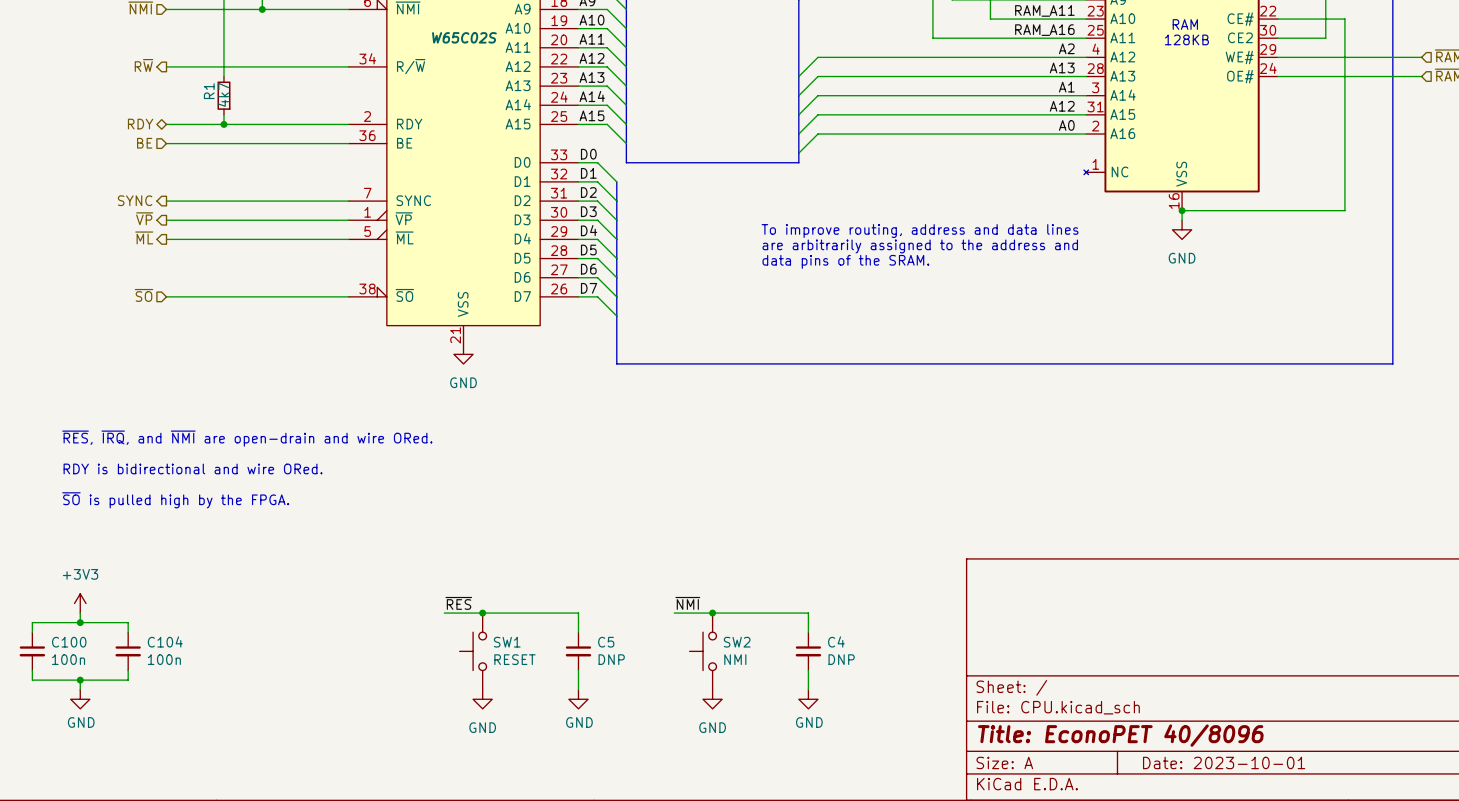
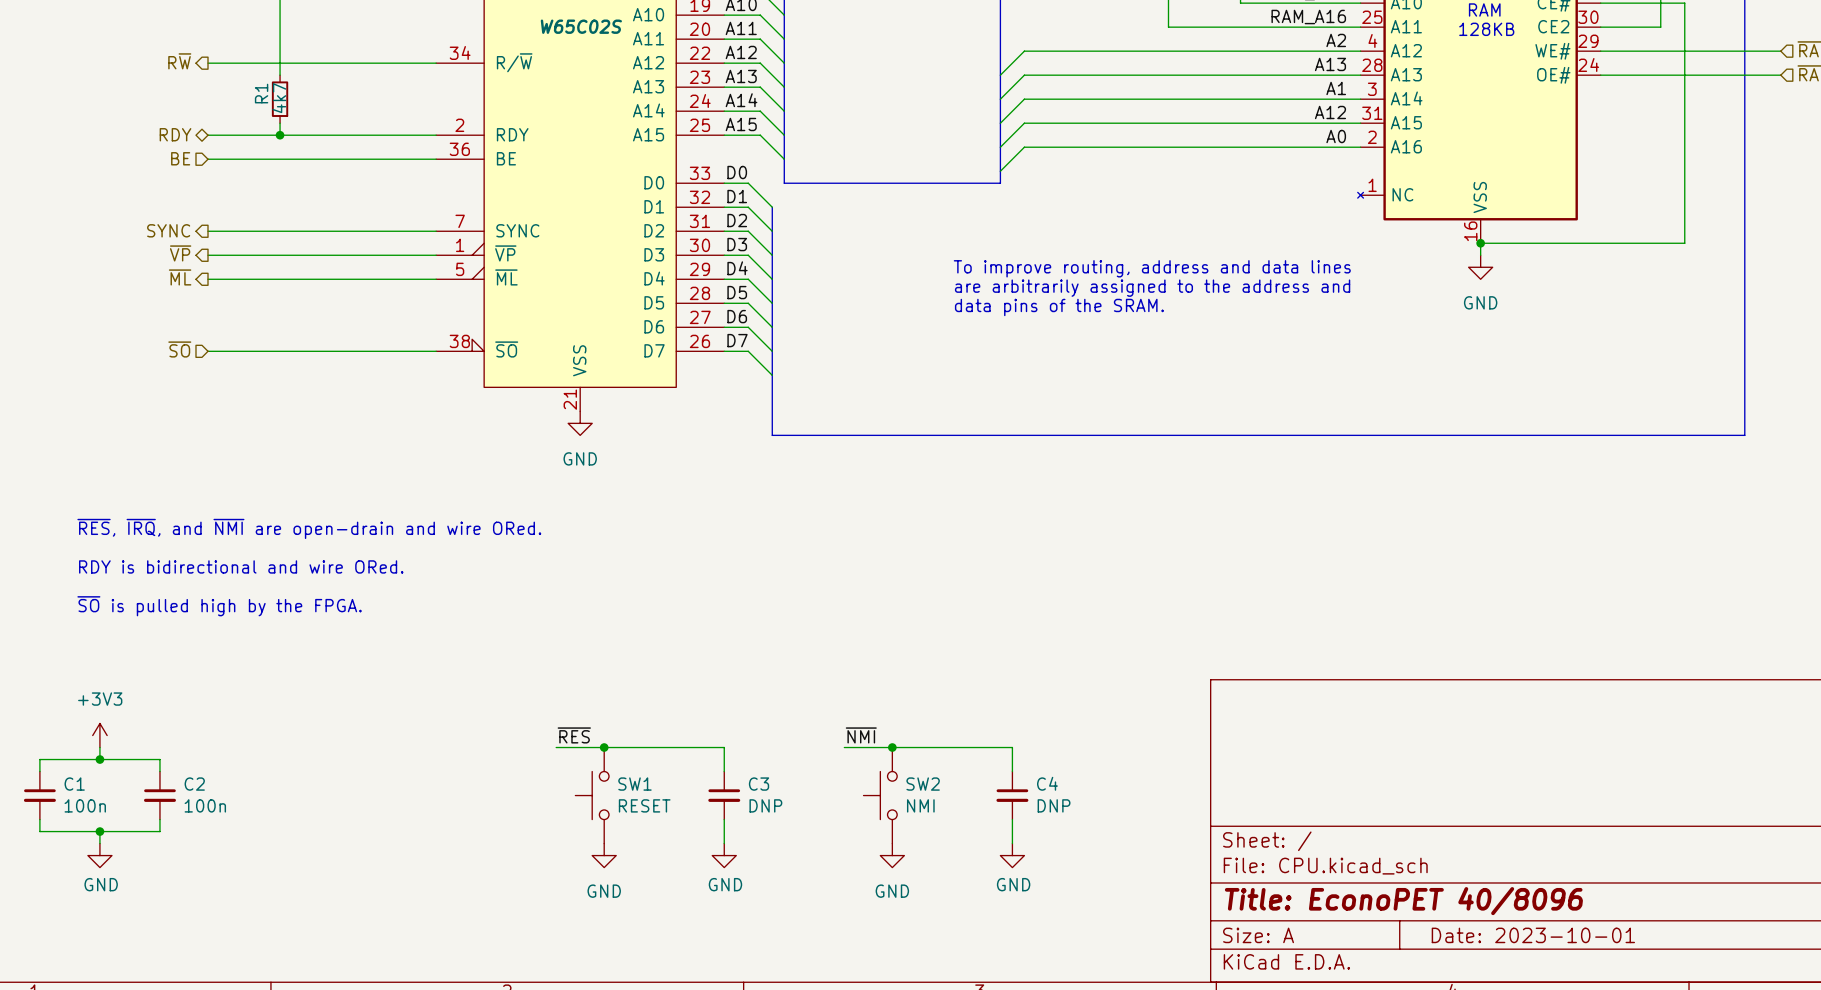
C104 name: C104 (165, 641) -> C2 (194, 784)
C100 name: C100 (69, 642) -> C1 (74, 784)
C5 name: C5 (606, 642) -> C3 (759, 784)

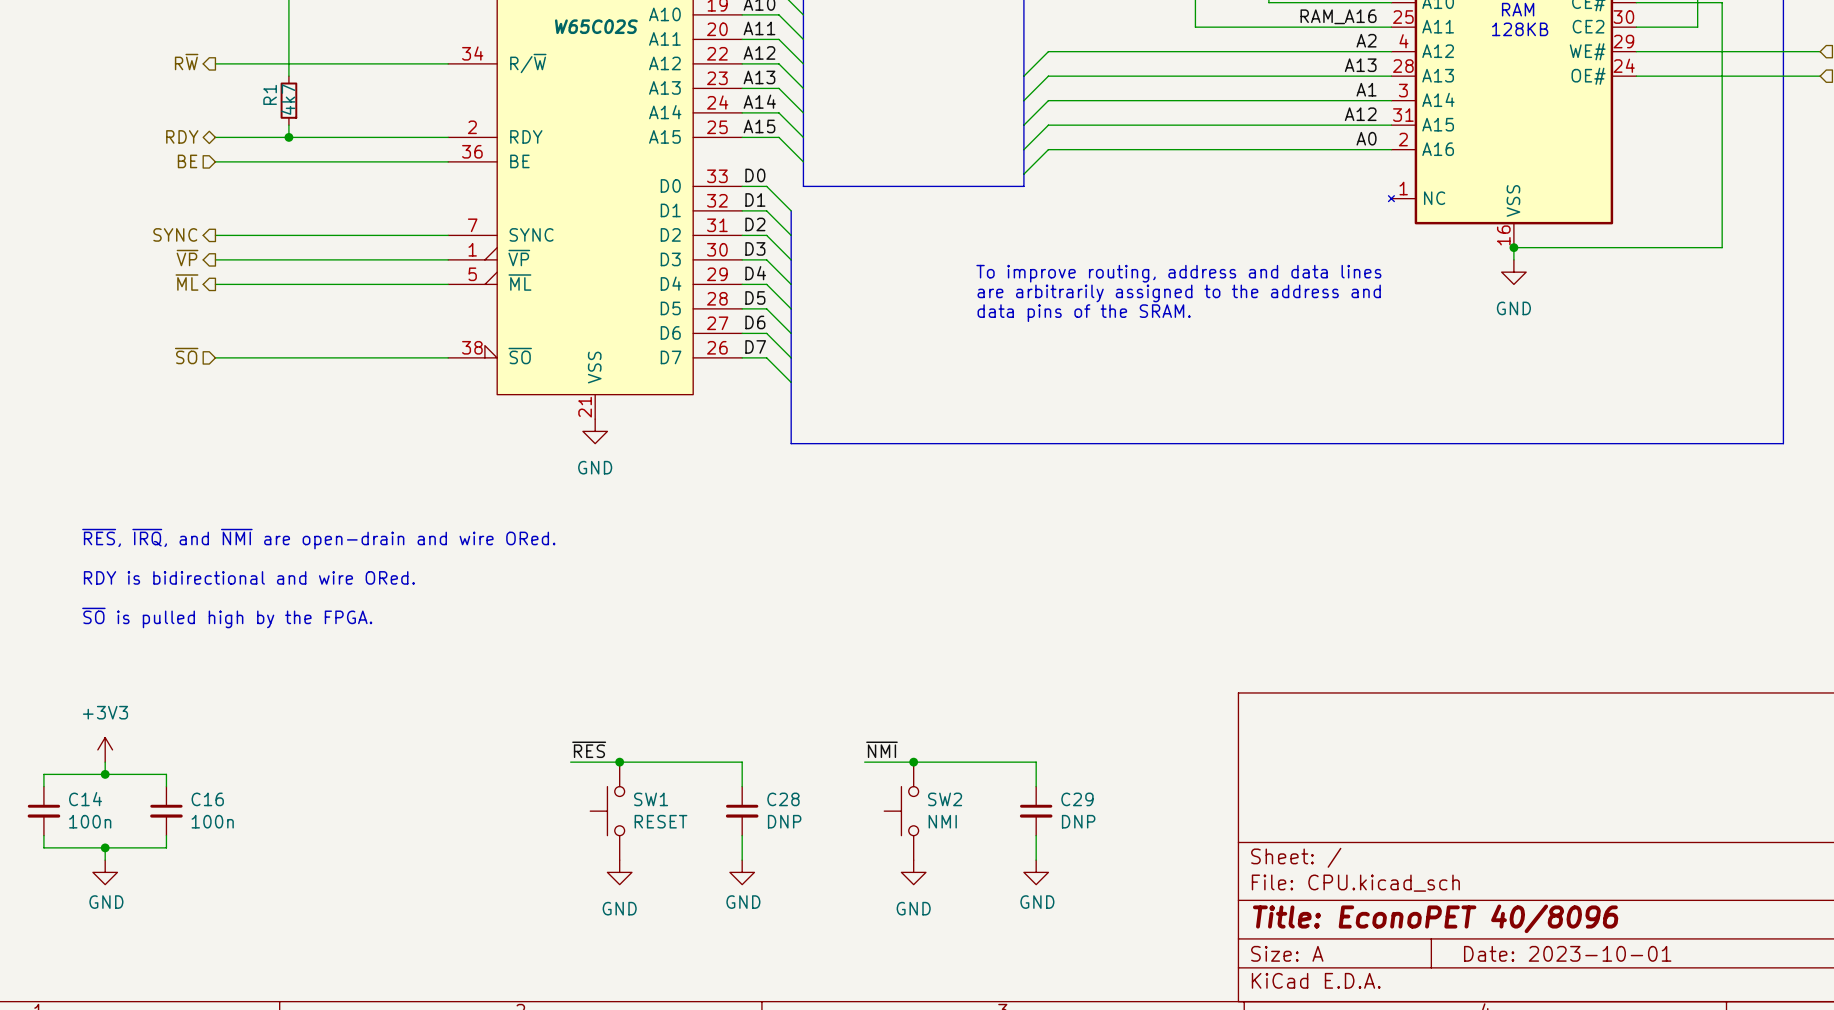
C4 name: C4 (1047, 783) -> C29 (1077, 799)
C1 name: C1 (74, 784) -> C14 (85, 799)
C2 name: C2 (194, 784) -> C16 (207, 799)
C3 name: C3 (759, 784) -> C28 (783, 799)

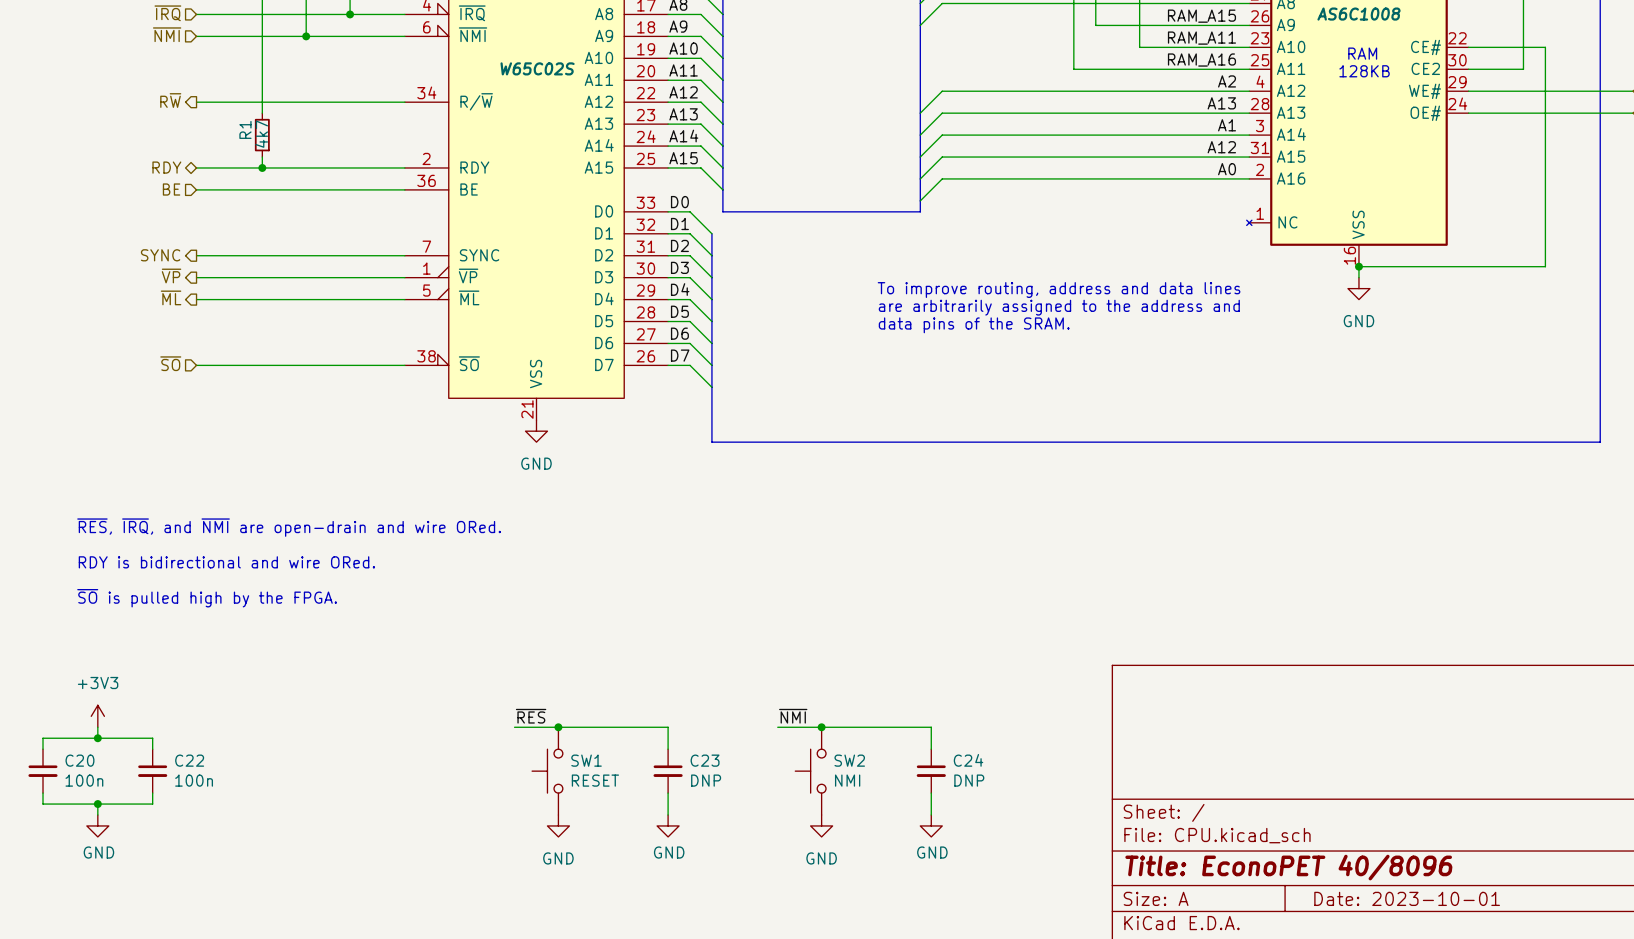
C14 name: C14 (85, 799) -> C20 (79, 760)
C16 name: C16 (207, 799) -> C22 (189, 760)
C28 name: C28 (783, 799) -> C23 (705, 760)
C29 name: C29 (1077, 799) -> C24 (968, 760)

